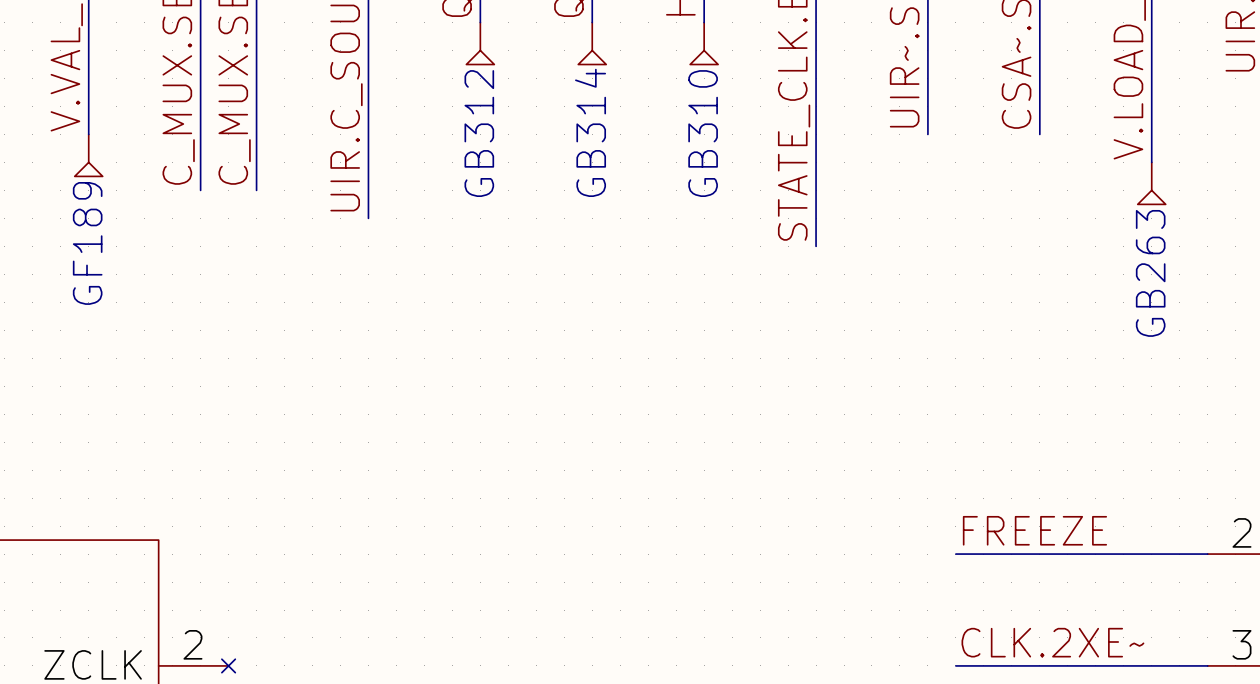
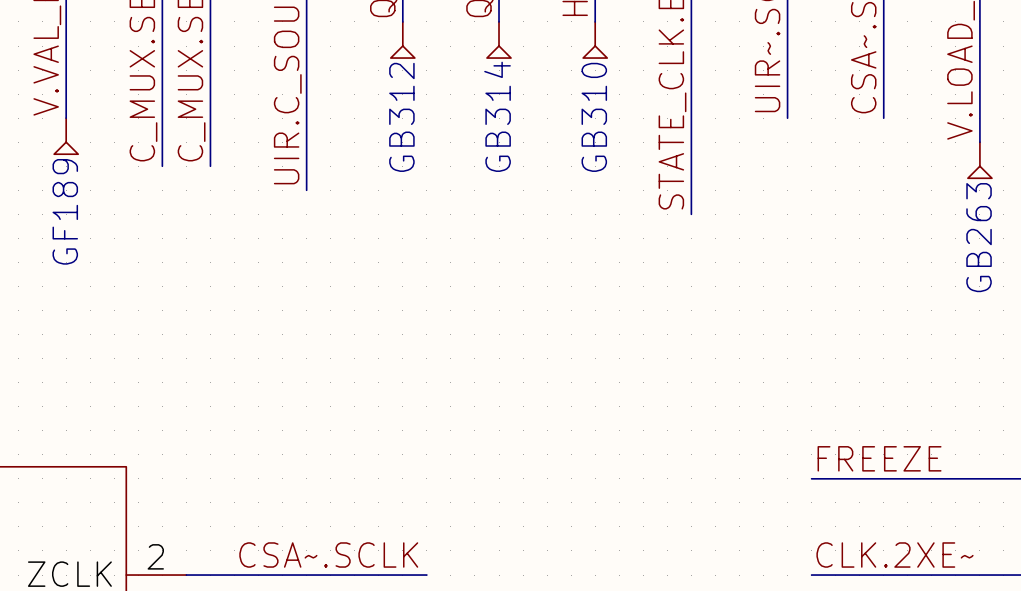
label: none -> CSA~.SCLK (328, 555)
wire: none -> (186, 575) (426, 575)
no-connect mark: (228, 665) -> none

